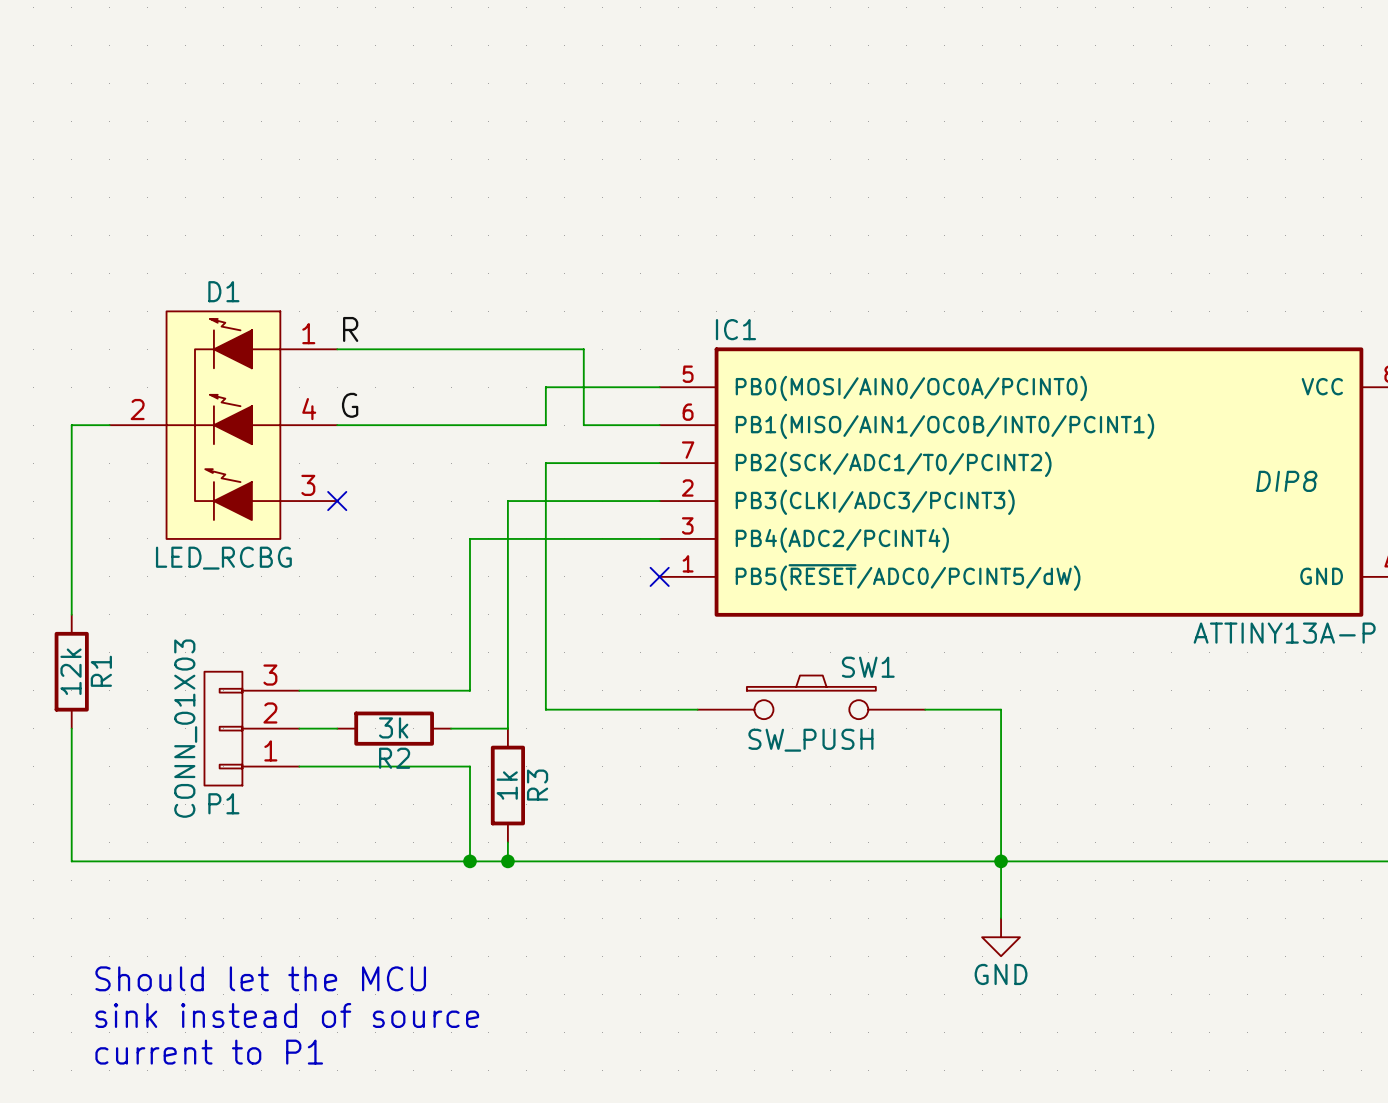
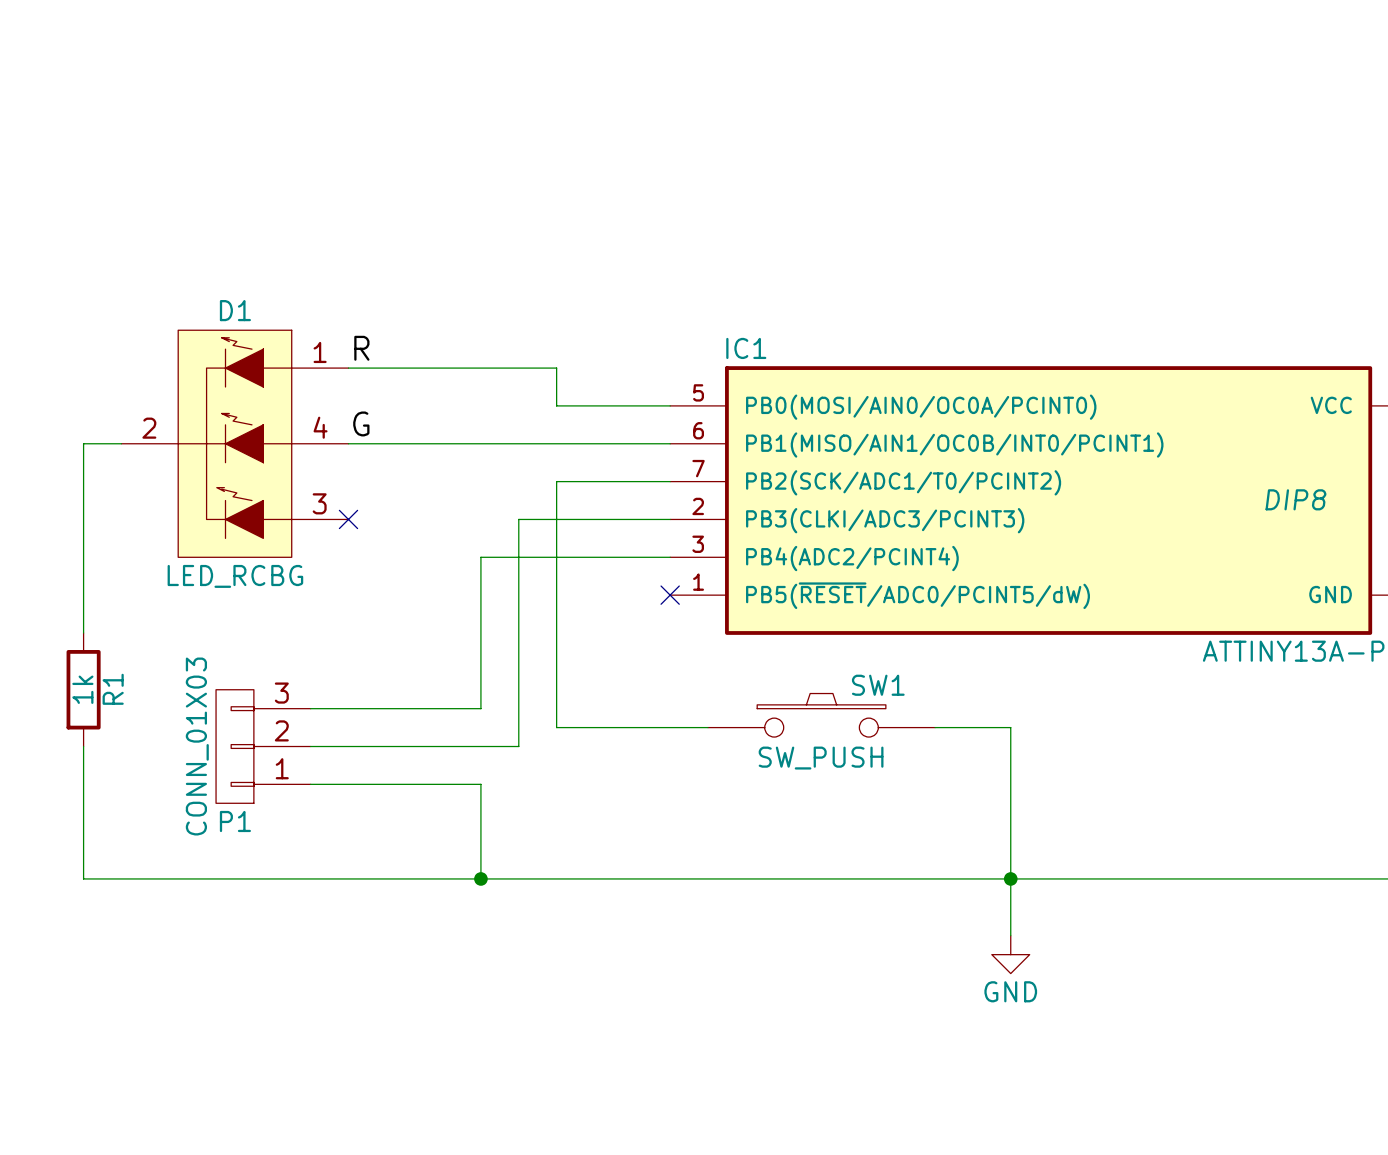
wire: (545, 349) (583, 349) (583, 425) -> (556, 368) (556, 405)
wire: (545, 387) (545, 425) -> (594, 443) (556, 443)
R1 value: 12k (71, 671) -> 1k (82, 689)
wire: none -> (348, 746) (462, 746)
R2: 3k (394, 728) -> none
R3: 1k (507, 785) -> none
wire: (507, 842) (507, 861) -> none
junction: (507, 861) -> none
text: Should let the MCU (260, 978) -> none
text: sink instead of source (287, 1015) -> none
text: current to P1 (209, 1052) -> none

